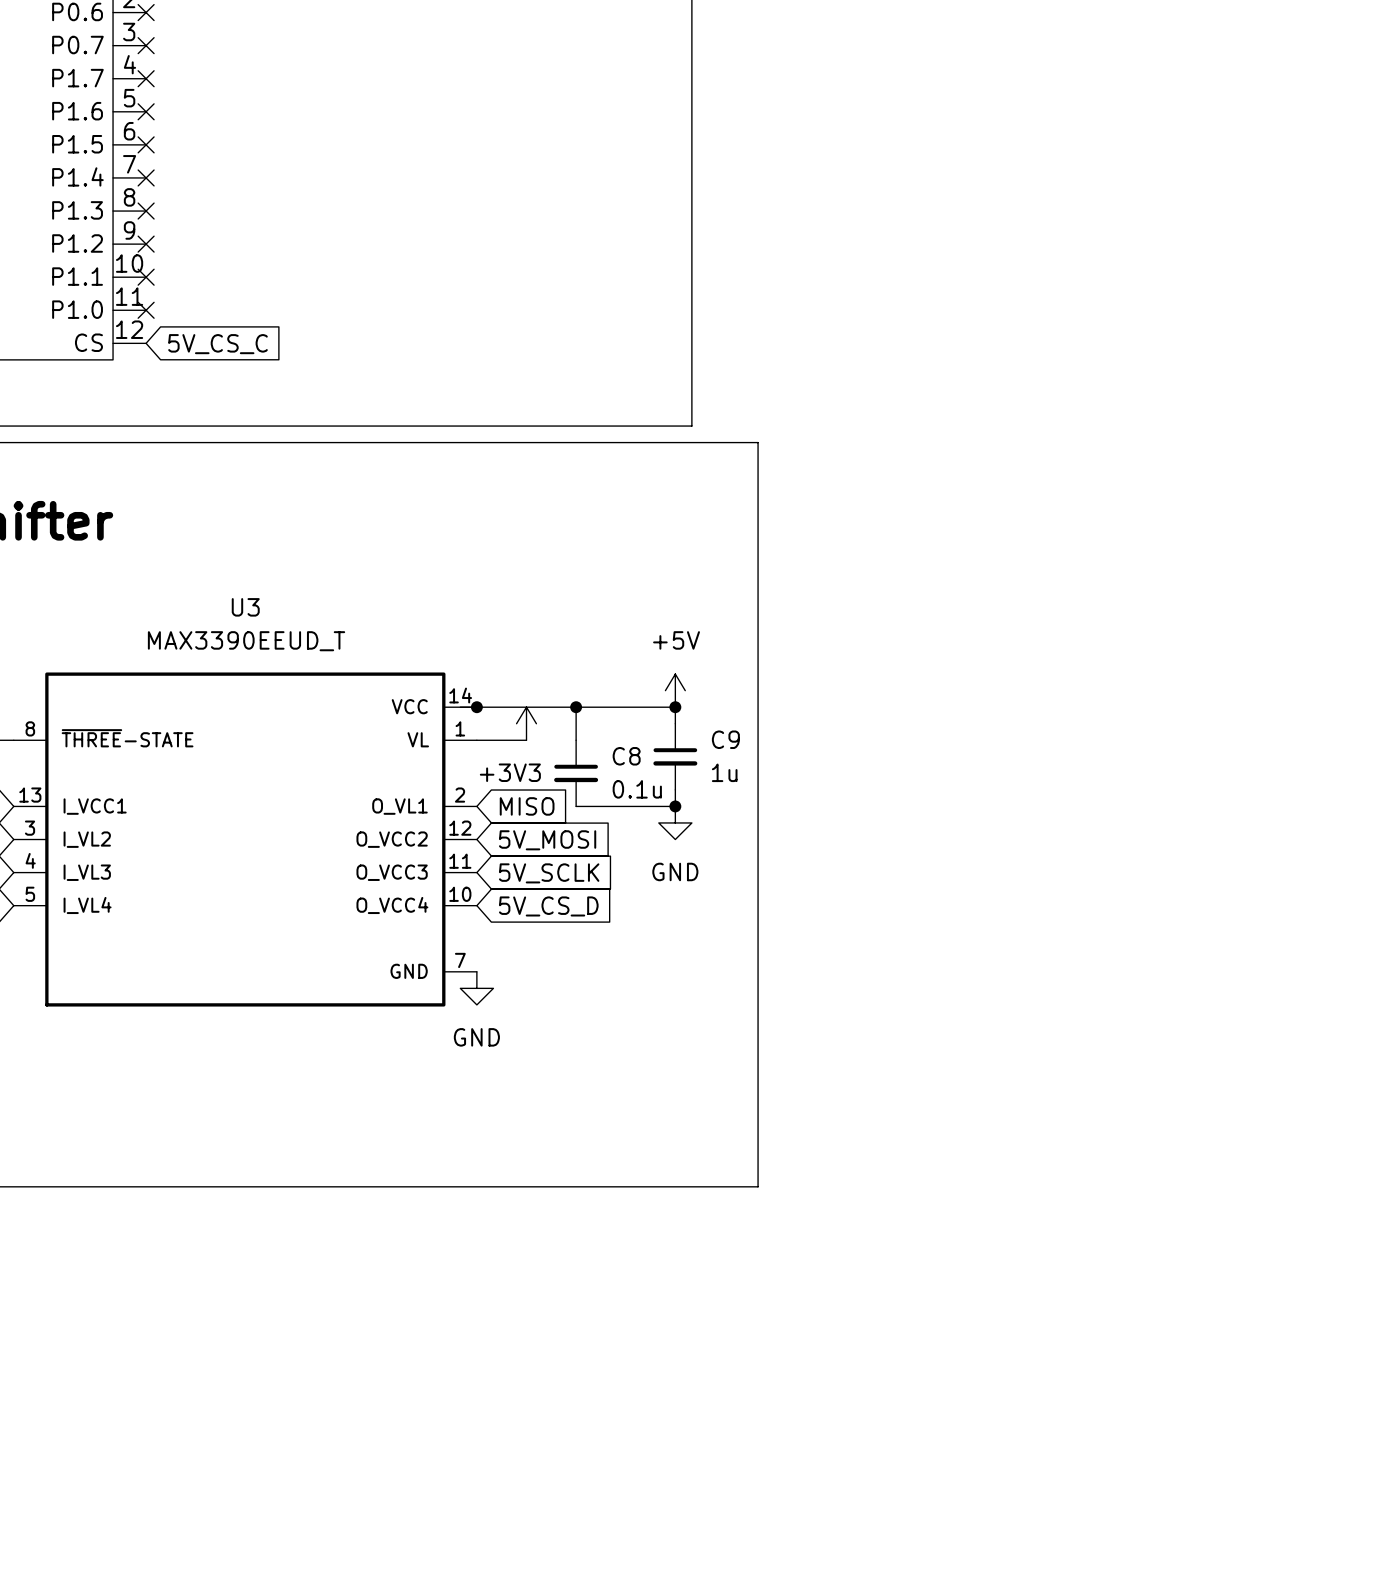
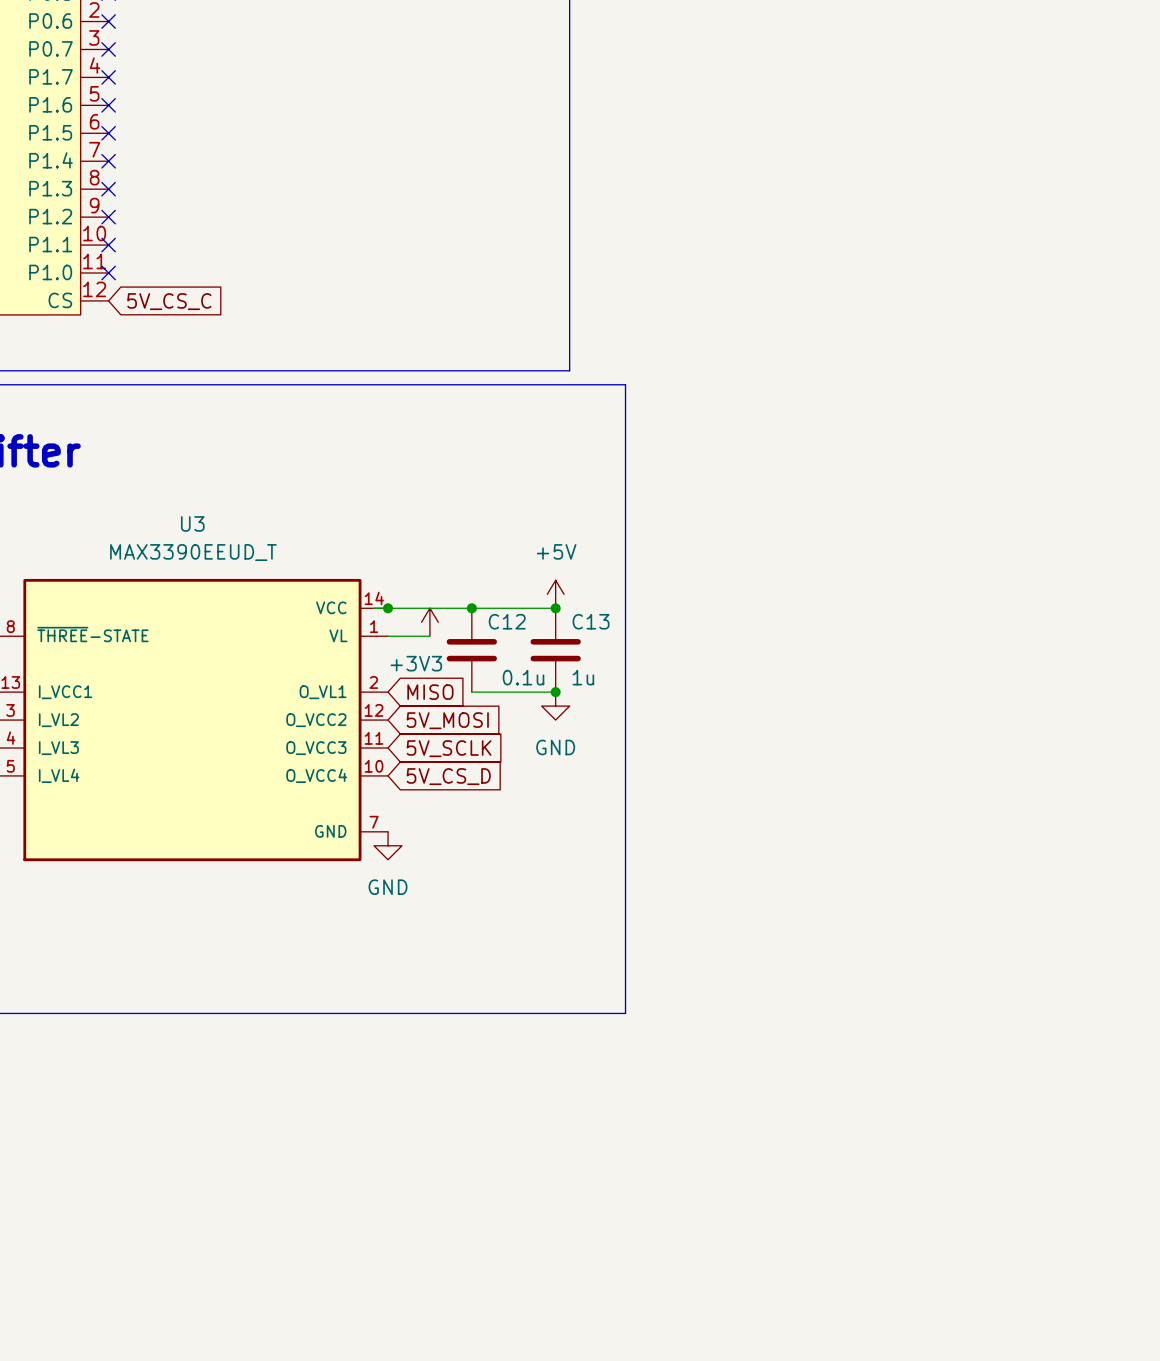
C12: none -> 0.1u (471, 650)
C9: 1u (675, 756) -> none
C13: none -> 1u (555, 650)
C8: 0.1u (576, 773) -> none

